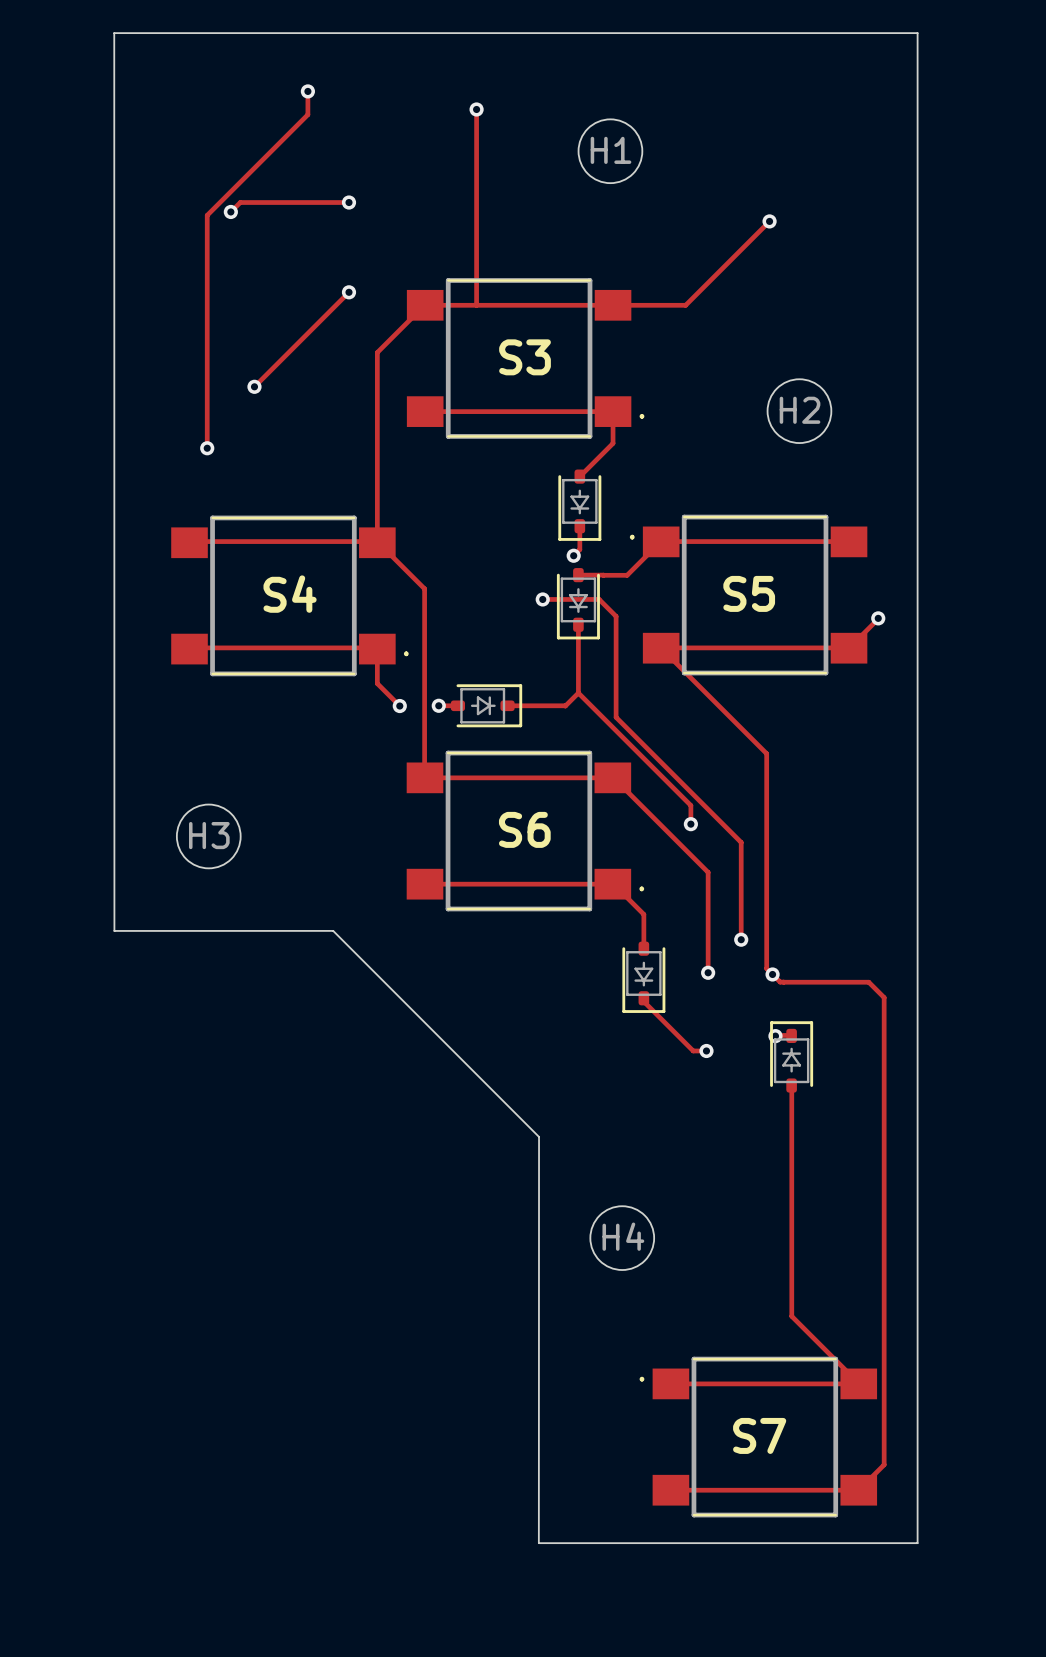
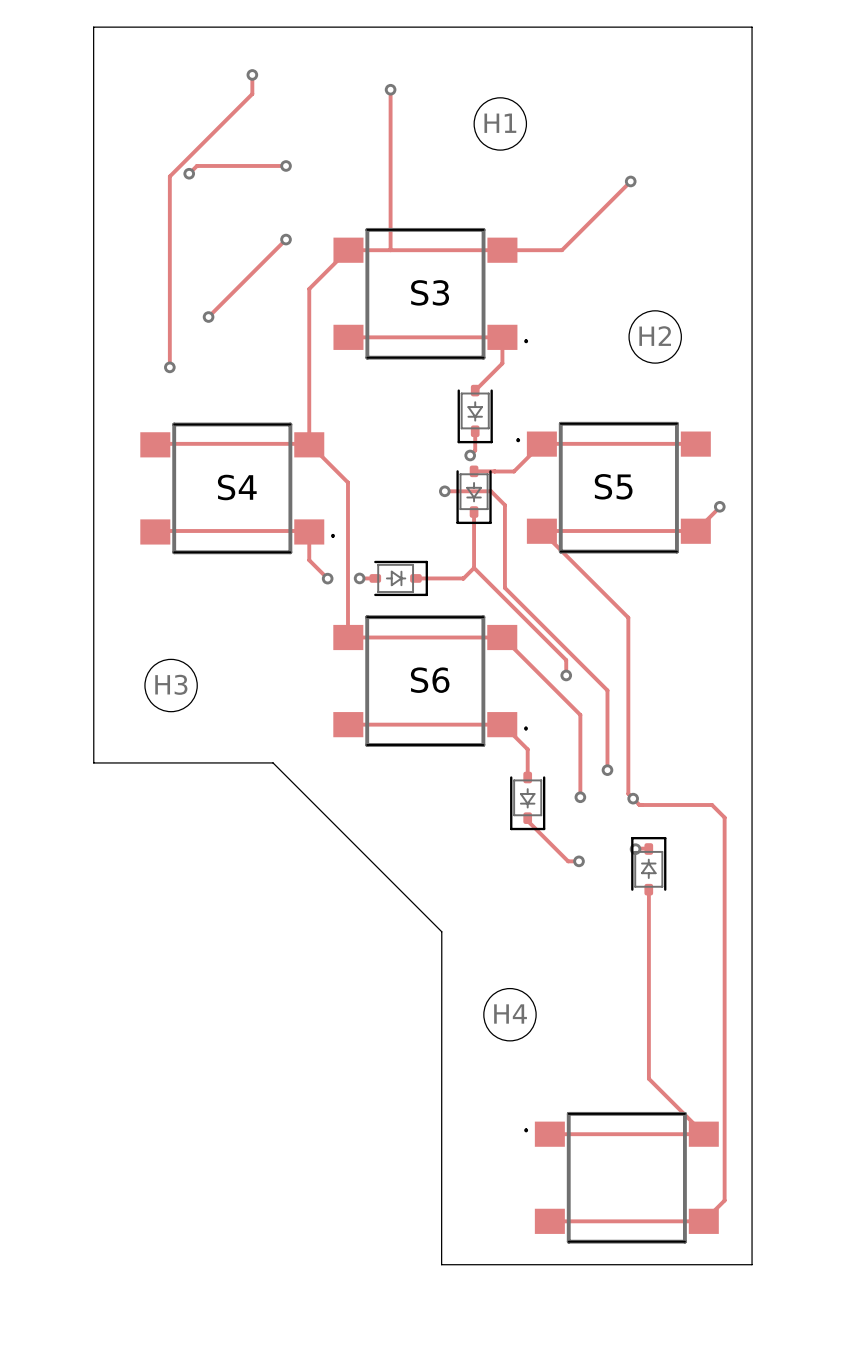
S7 name: S7 (759, 1435) -> none

